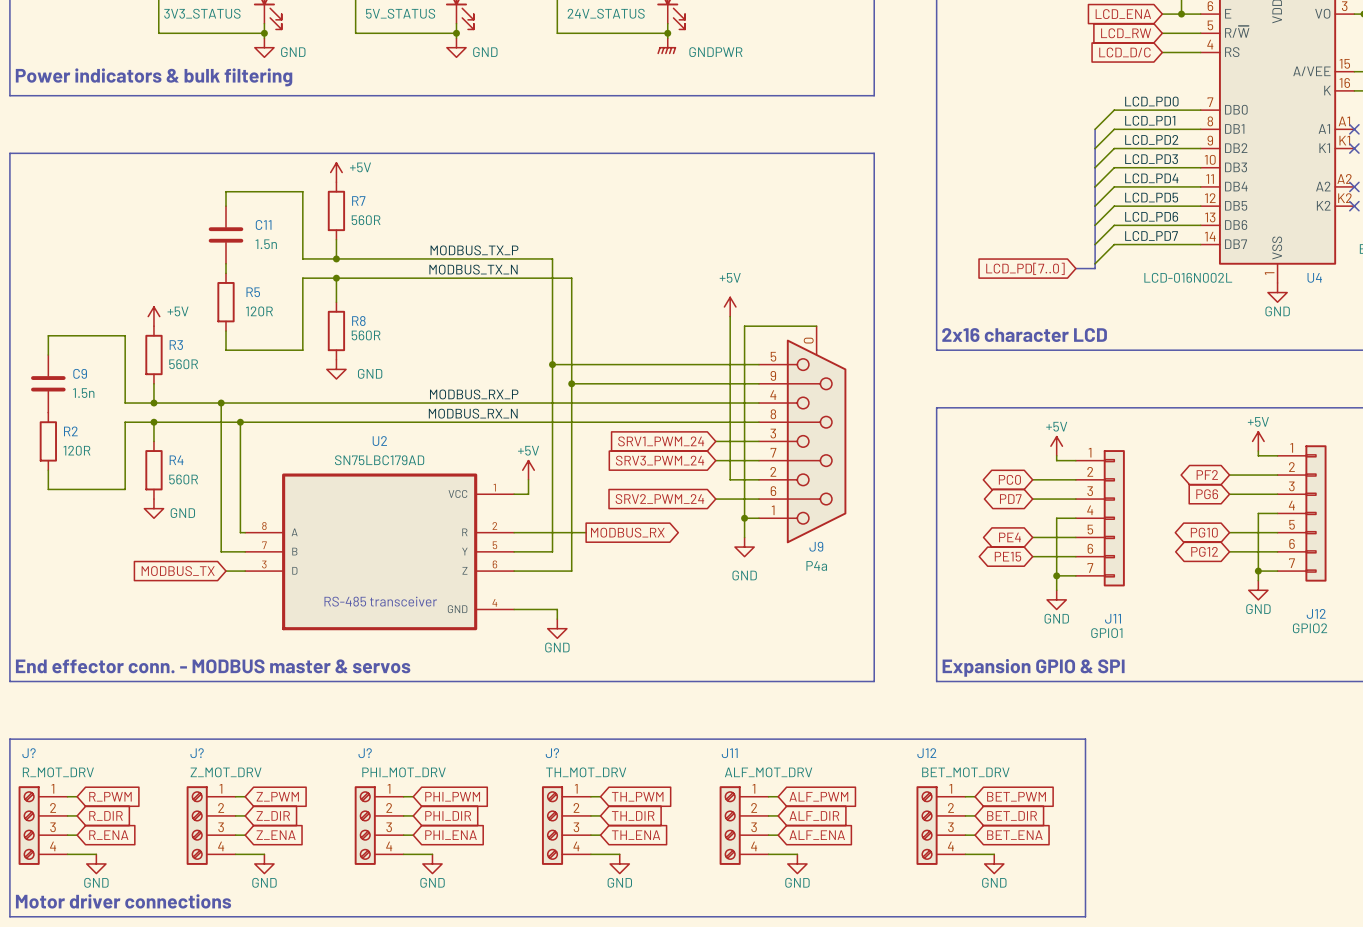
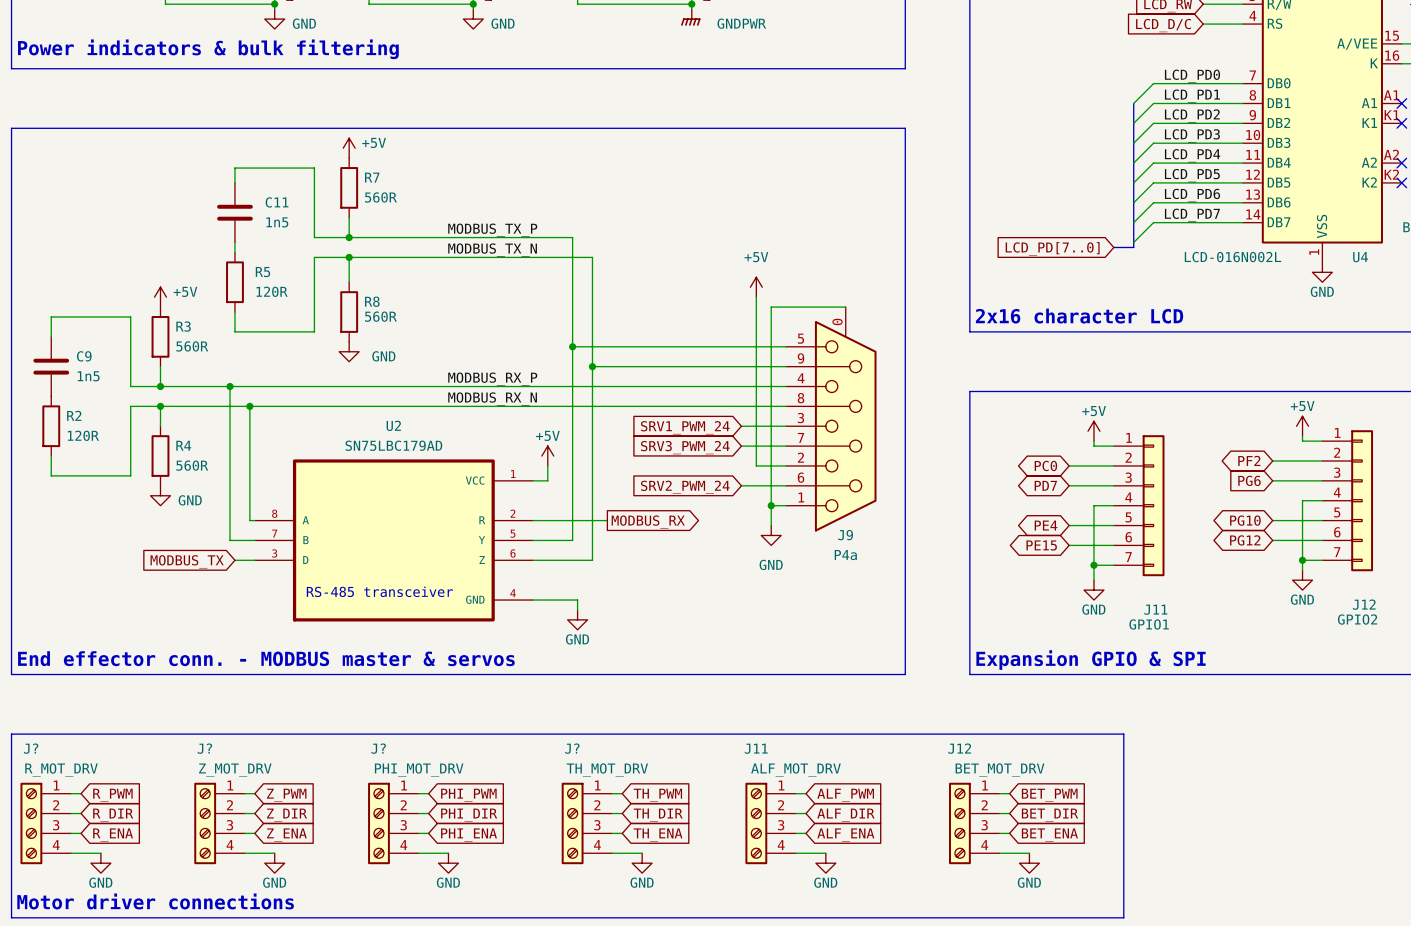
C11 value: 1.5n (266, 244) -> 1n5 (277, 222)
C9 value: 1.5n (83, 393) -> 1n5 (88, 376)

